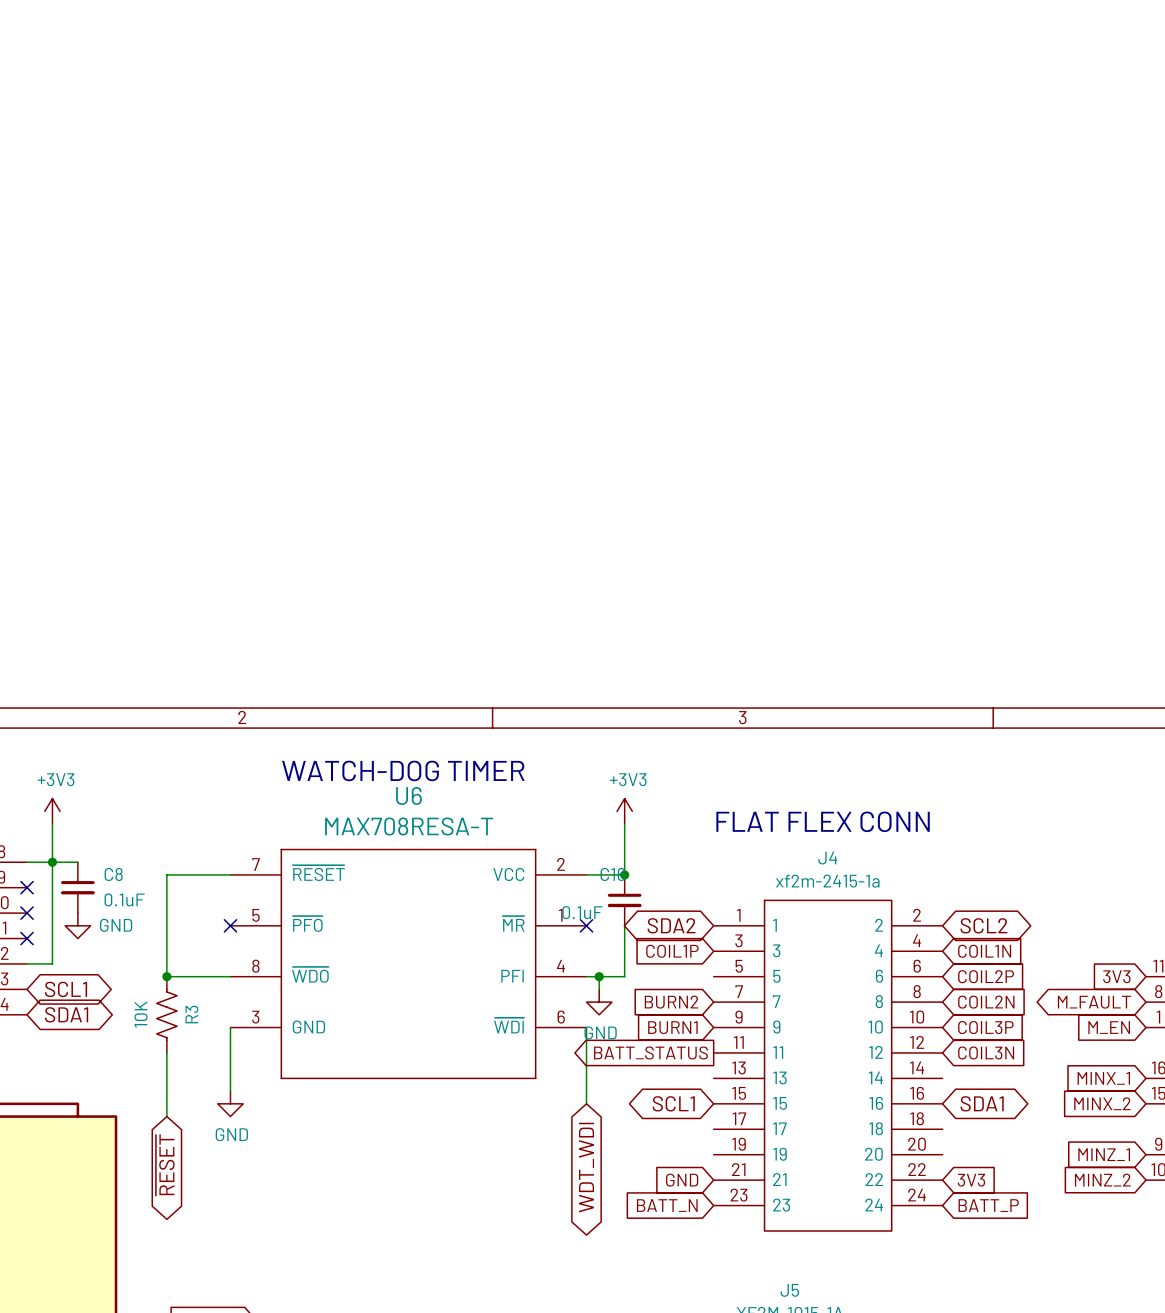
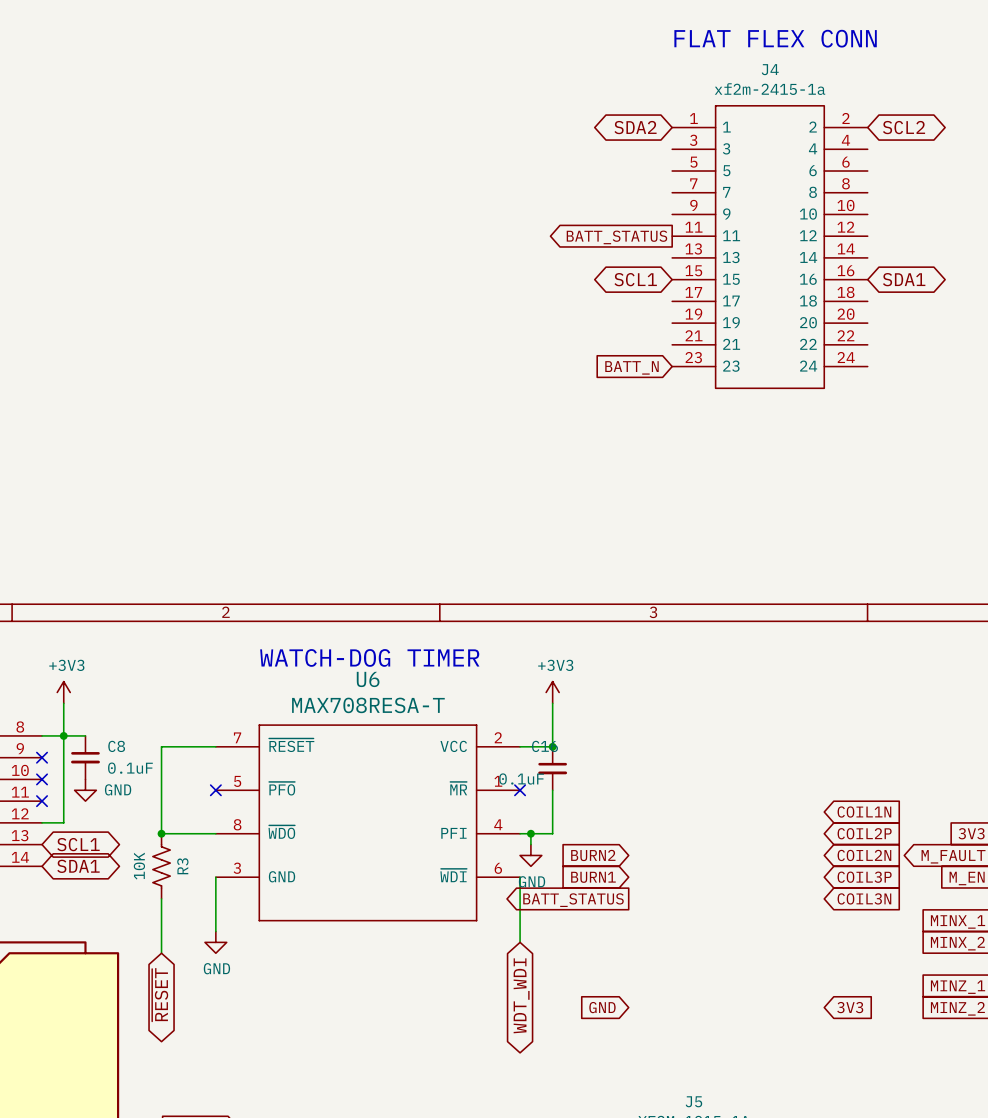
text: none -> FLAT FLEX CONN (775, 38)
global label: none -> SDA2 (635, 127)
global label: none -> SCL2 (904, 127)
global label: none -> BATT_STATUS (616, 237)
global label: none -> SCL1 (635, 279)
global label: none -> SDA1 (904, 279)
global label: none -> BATT_N (631, 367)
text: FLAT FLEX CONN (823, 821) -> none
global label: SDA2 (671, 925) -> none
global label: SCL2 (983, 925) -> none
global label: COIL1P (672, 951) -> none
J4 position: (828, 1065) -> (769, 247)
global label: SCL1 (673, 1103) -> none
global label: SDA1 (982, 1103) -> none
global label: BATT_N (667, 1205) -> none
global label: BATT_P (988, 1205) -> none

